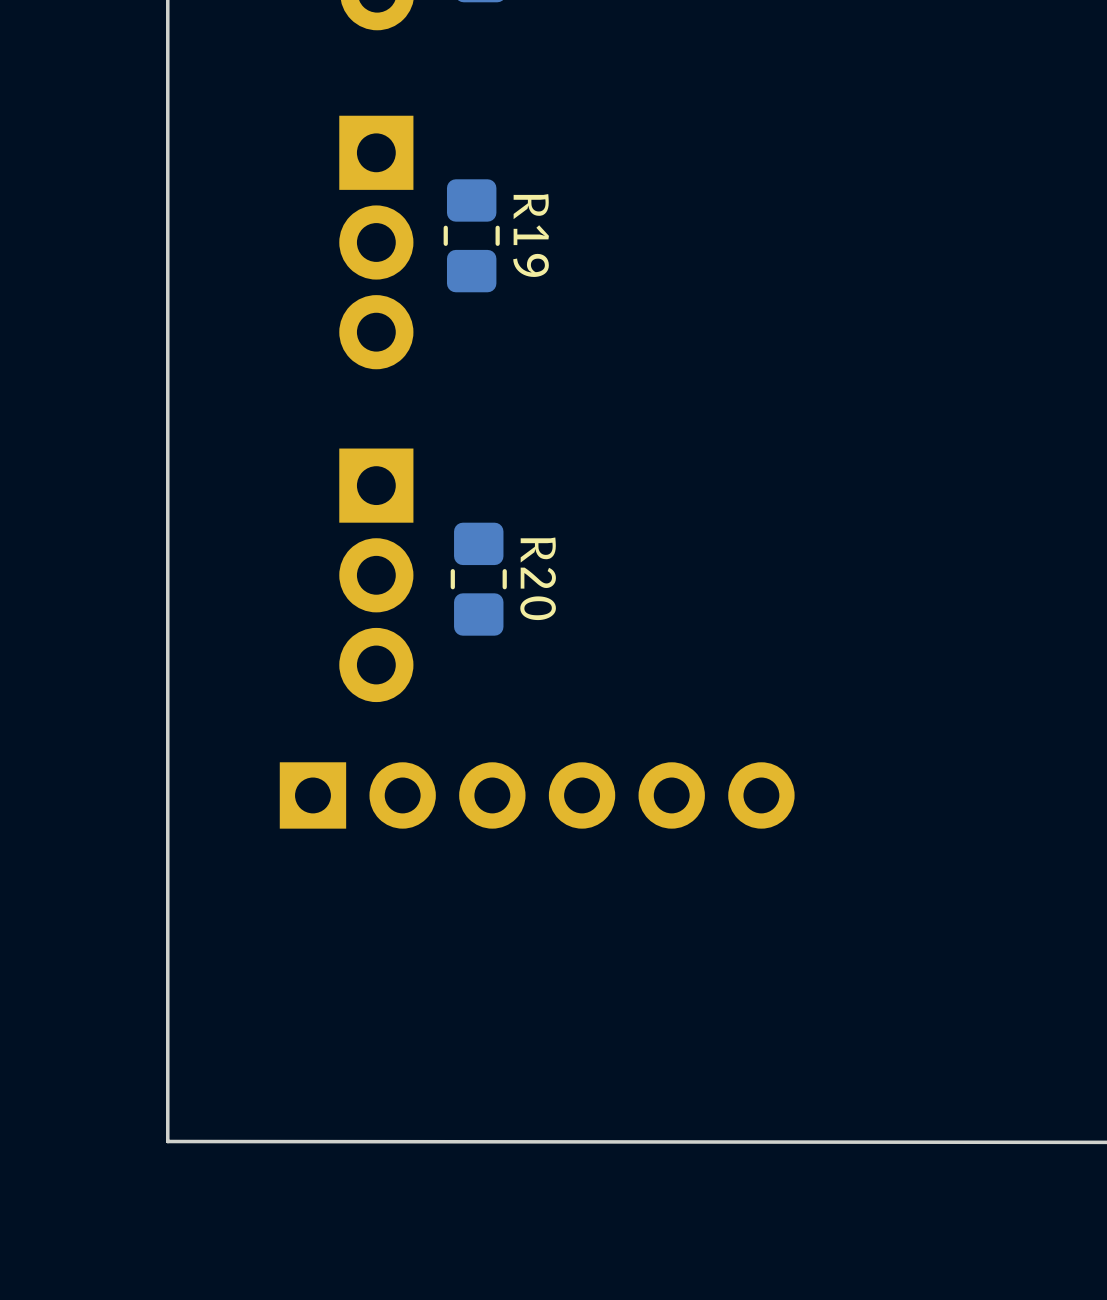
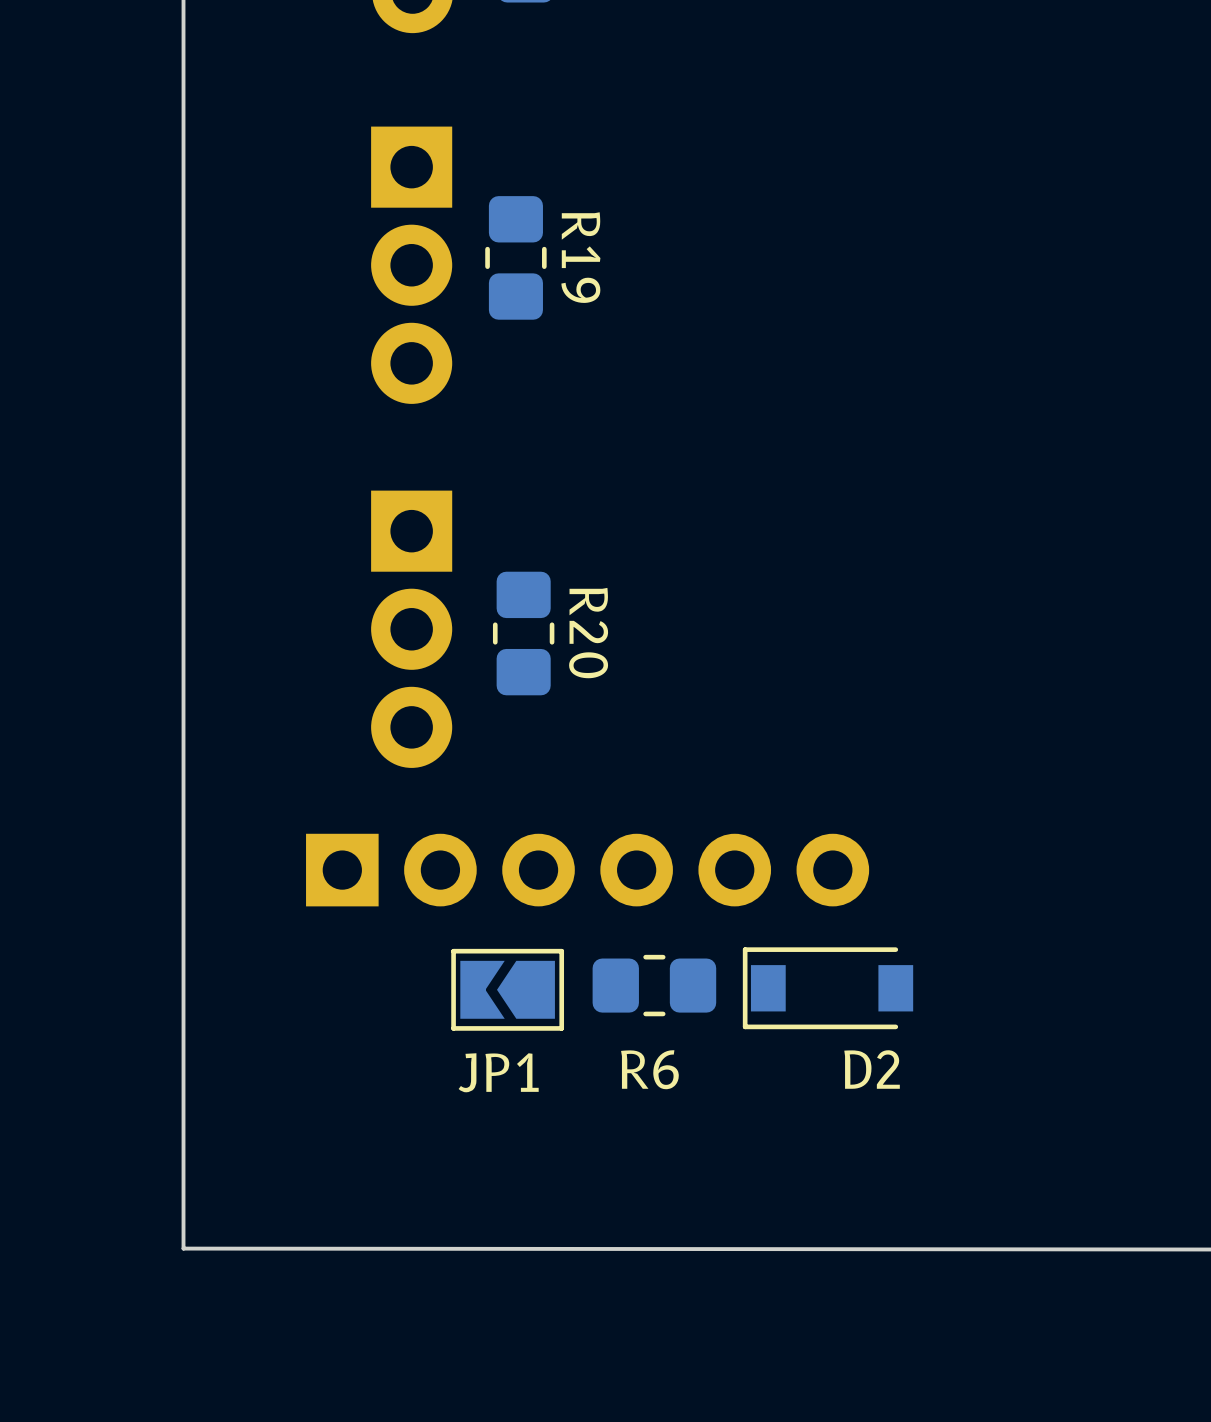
R6: none -> (654, 985)
D2: none -> (828, 988)
JP1: none -> (507, 989)

